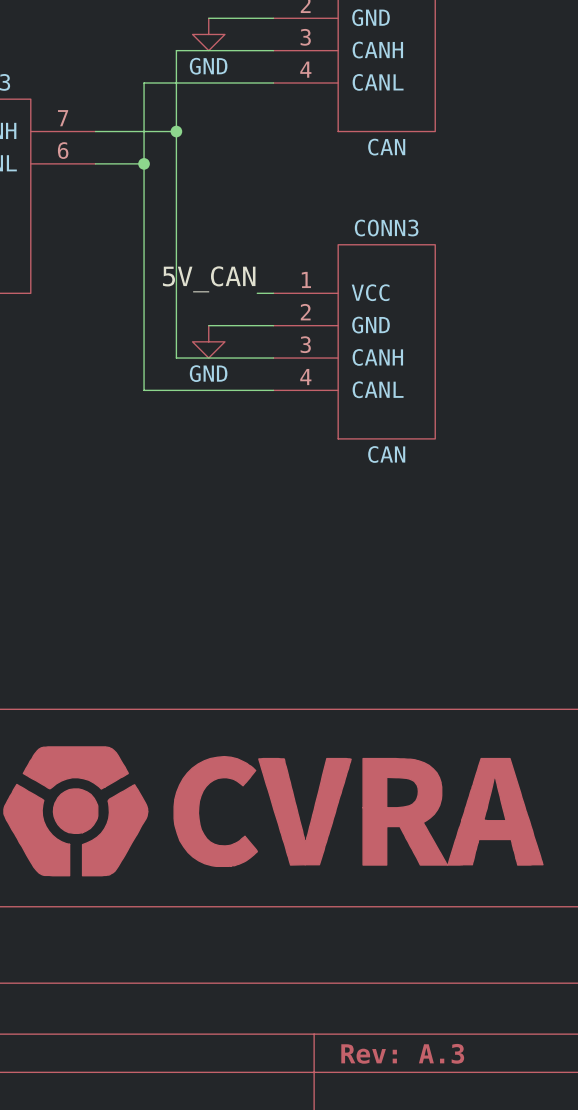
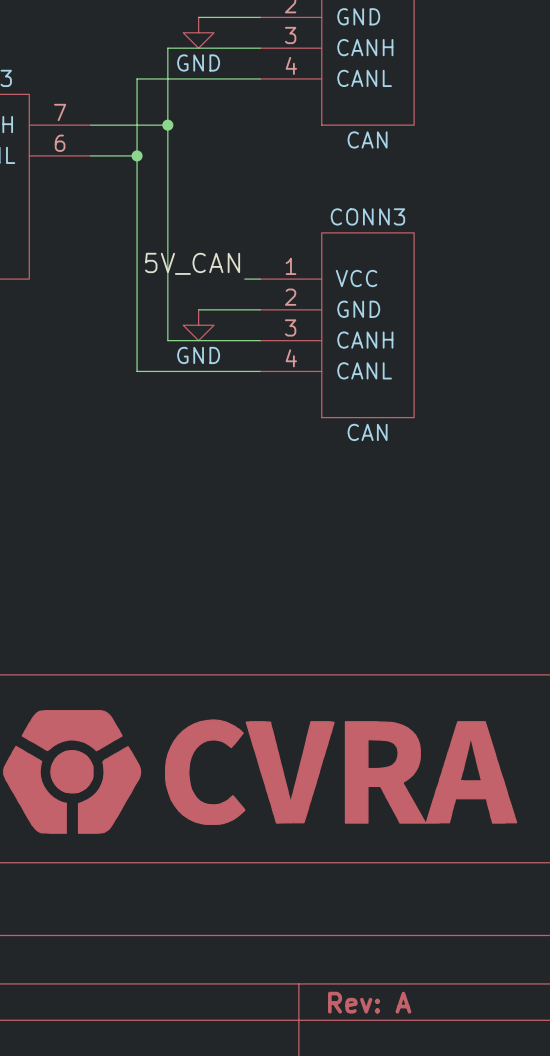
title block: Rev: A.3 (402, 1053) -> Rev: A (369, 1002)

